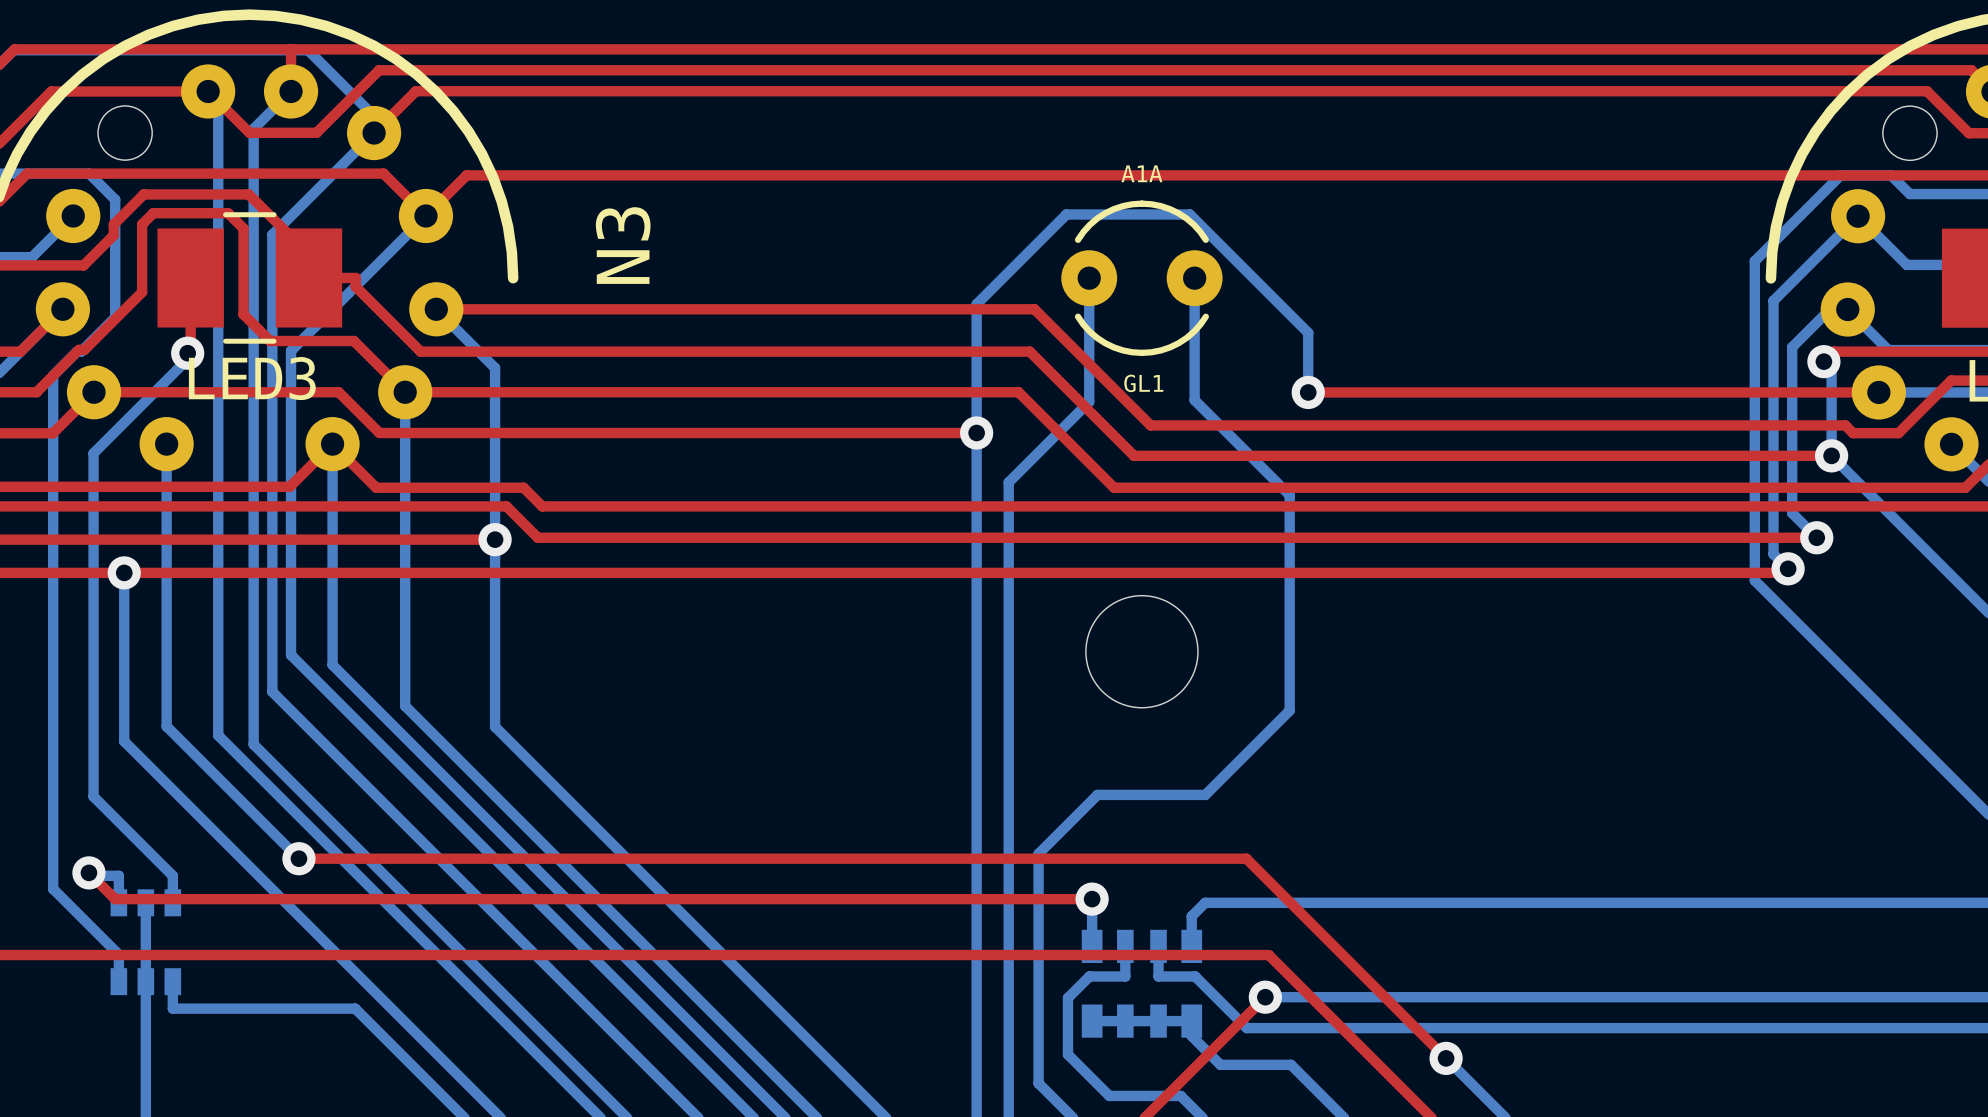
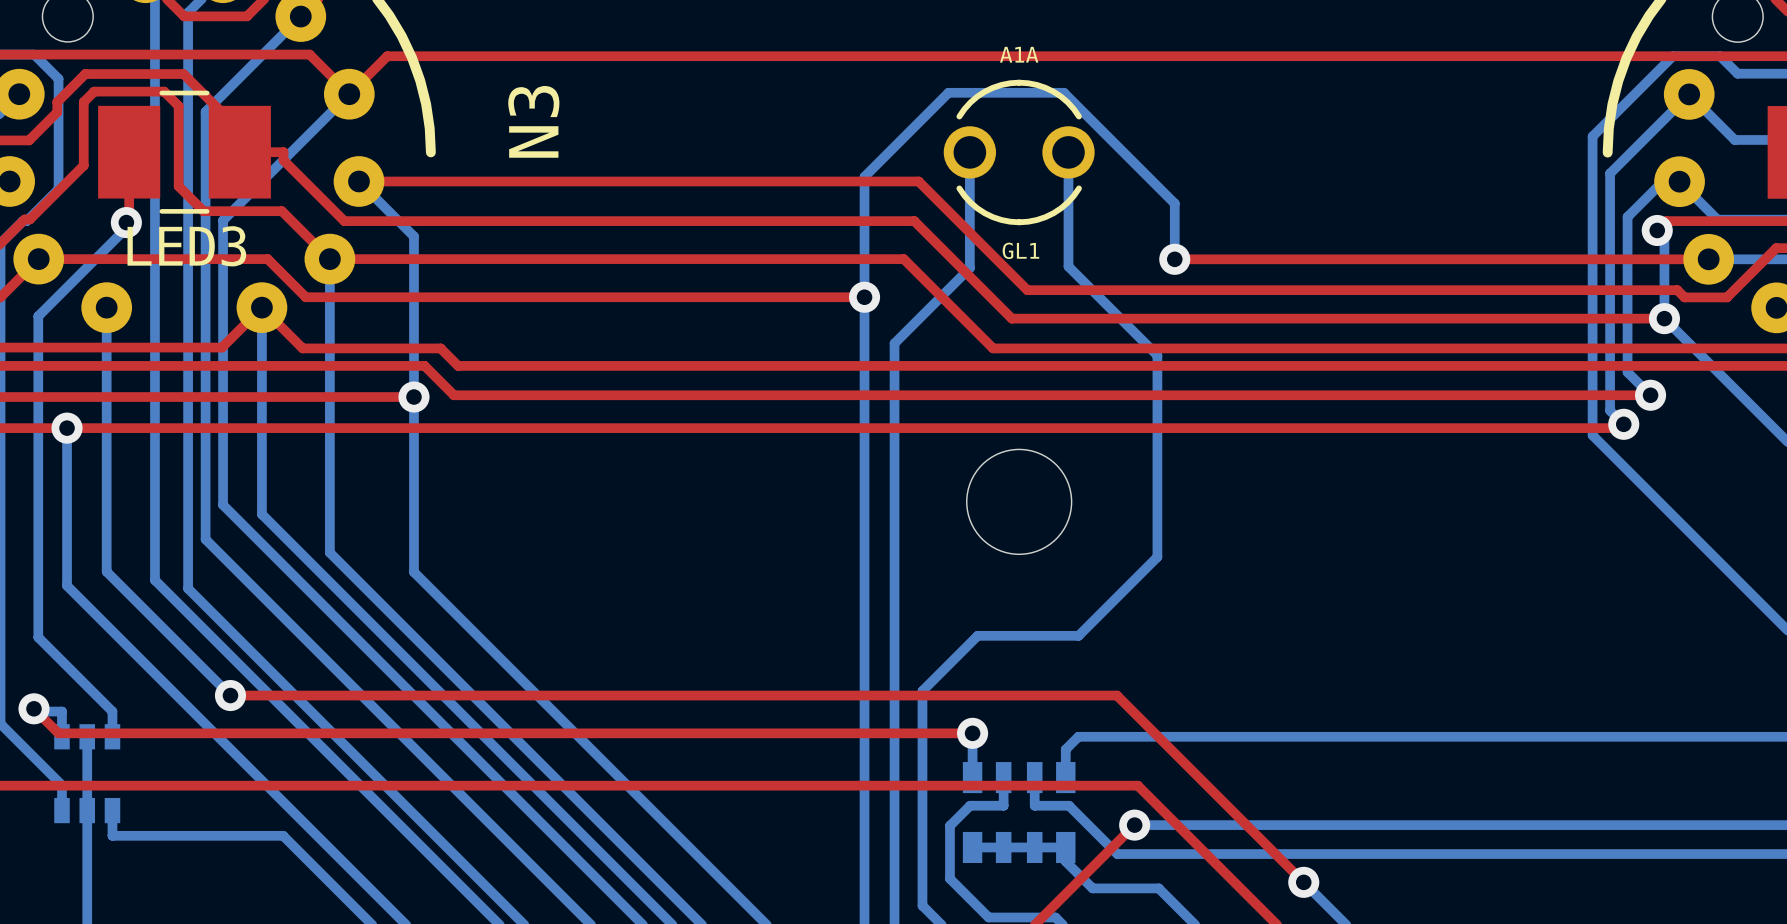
GL1 footprint: [1061, 200, 1223, 357] -> [943, 79, 1095, 226]

